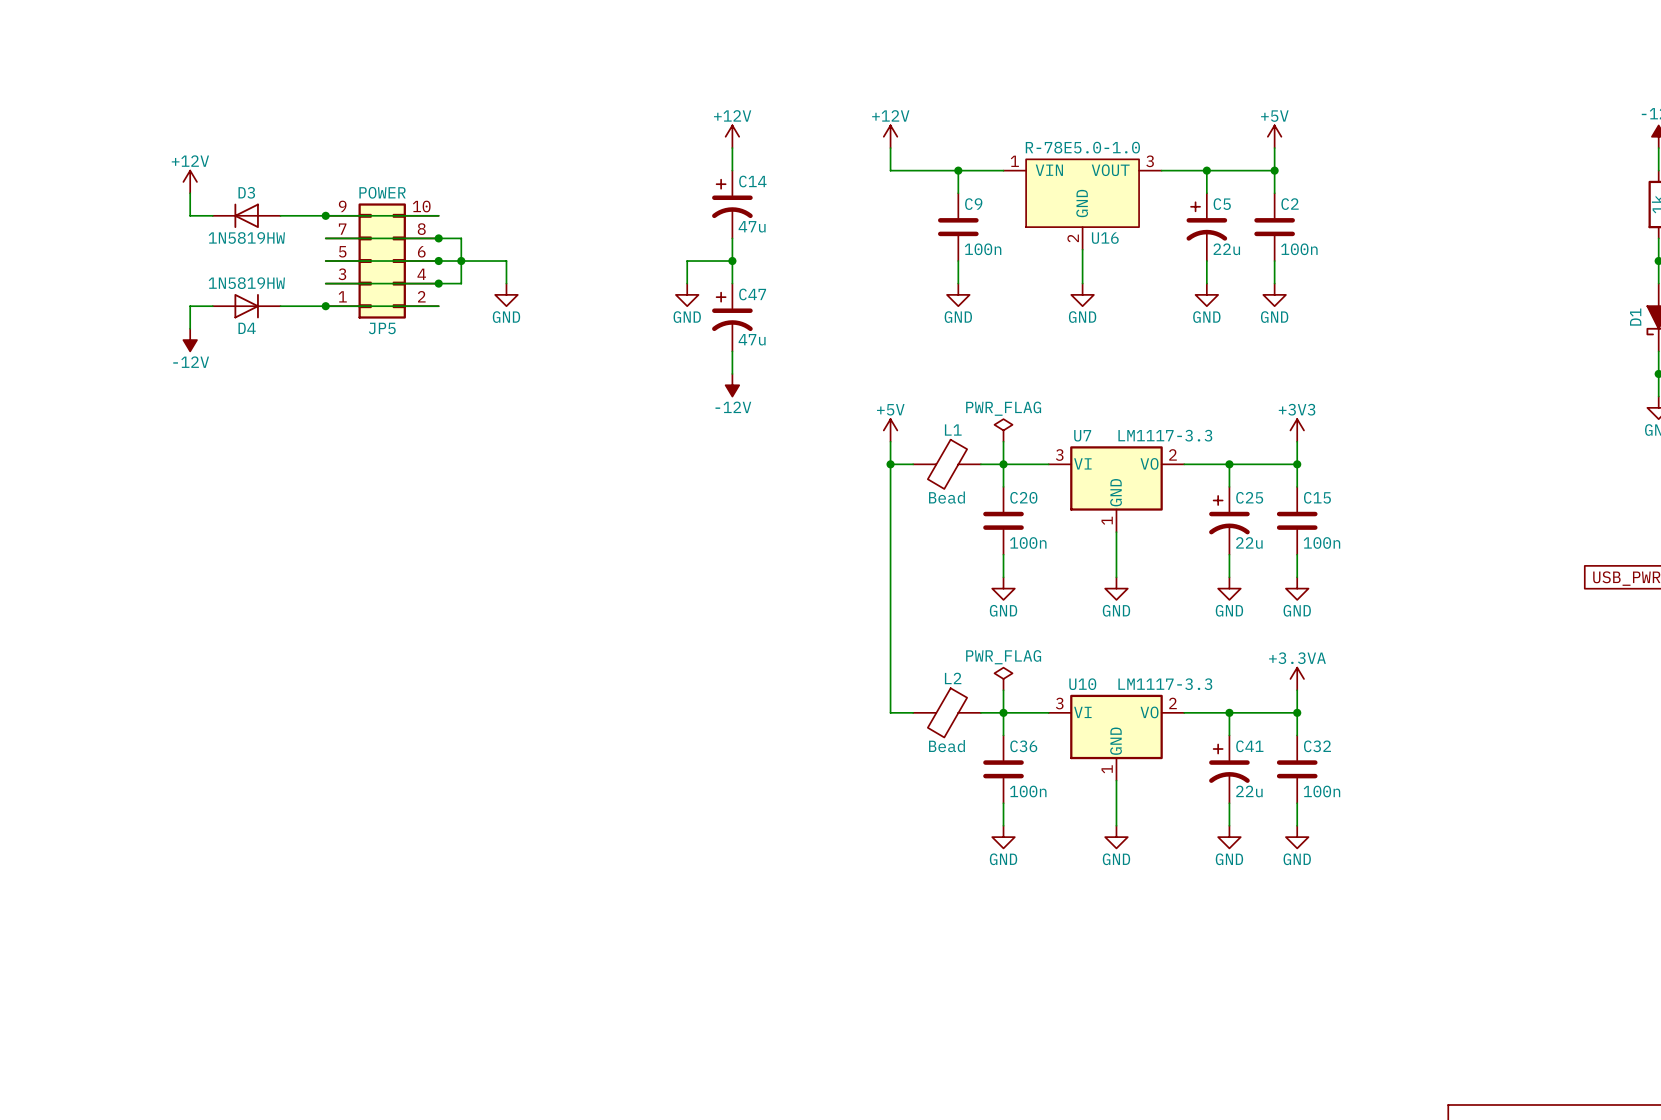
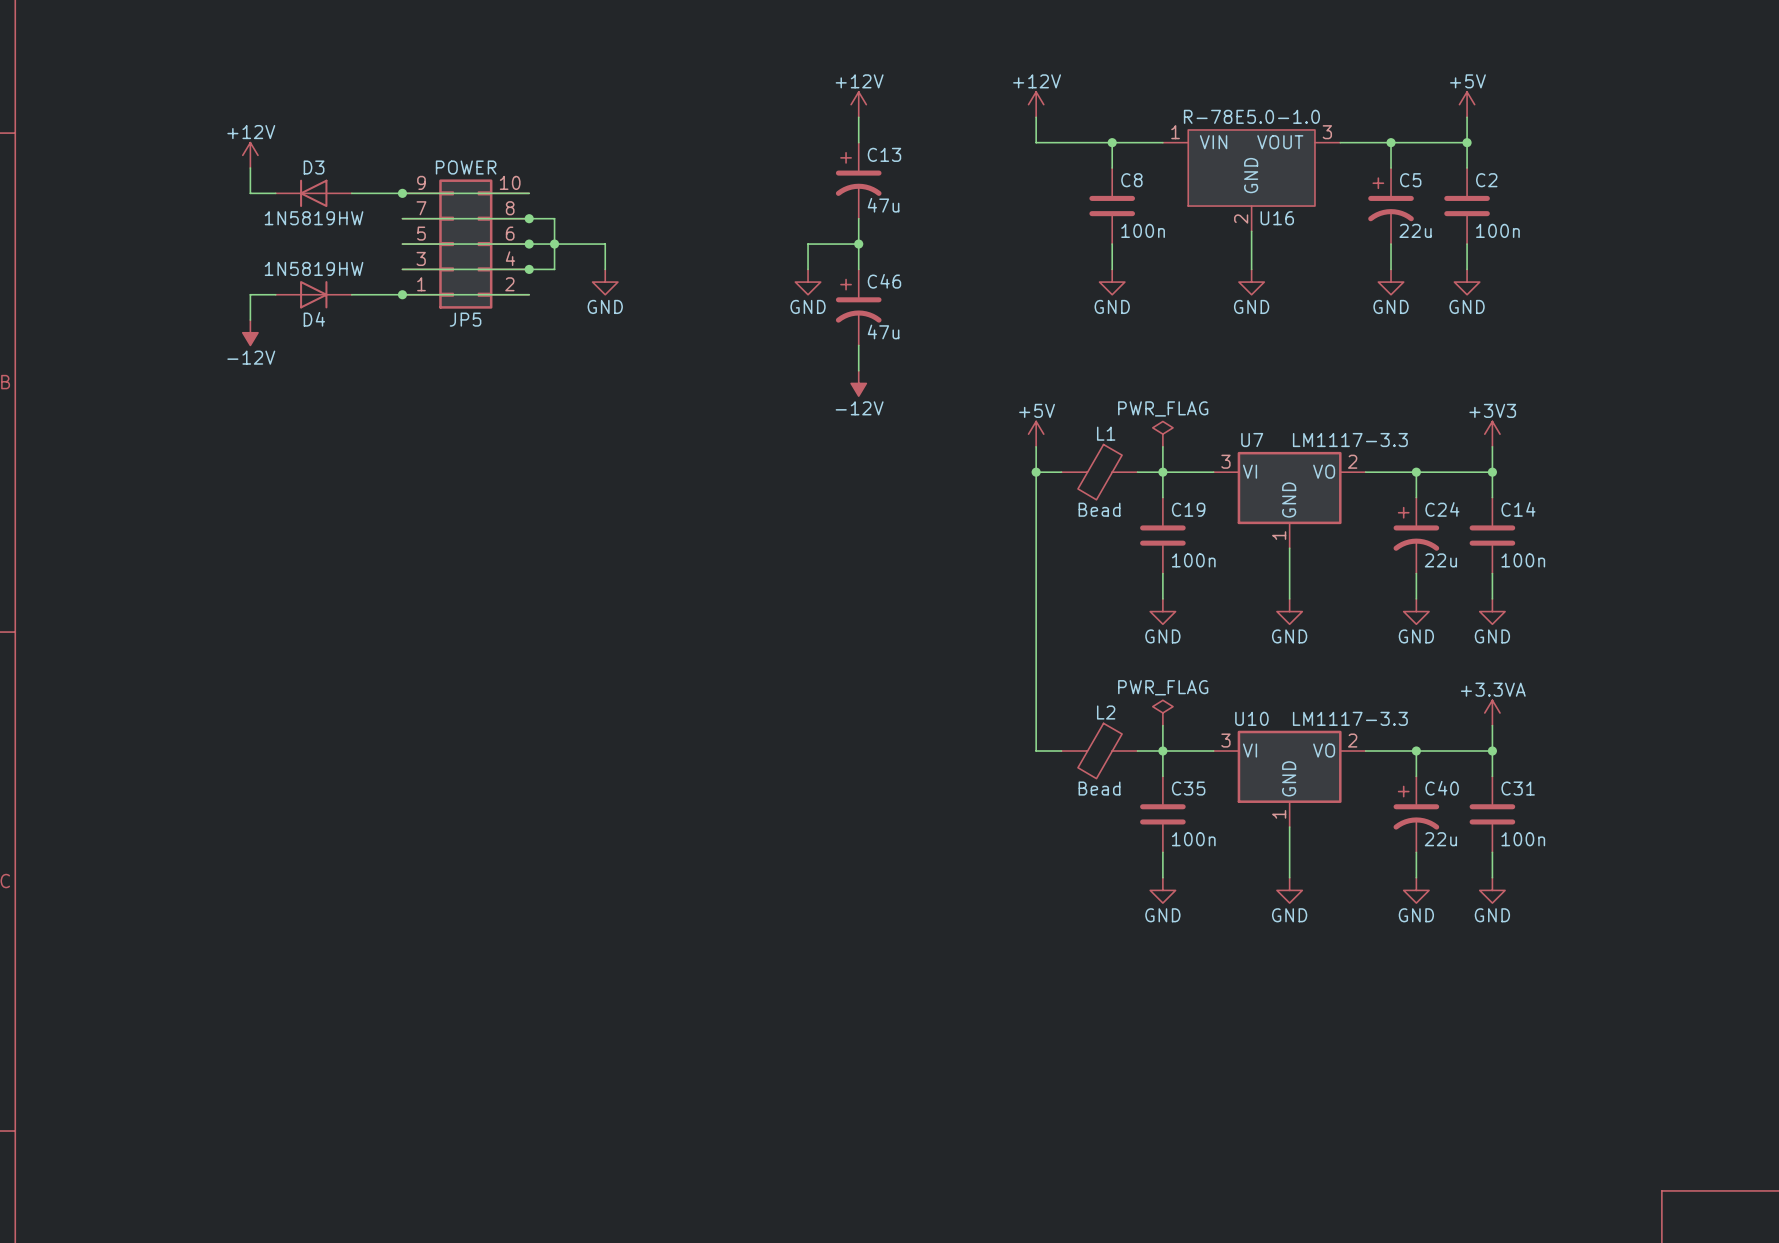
C14 name: C14 (752, 181) -> C13 (884, 154)
C9 name: C9 (973, 204) -> C8 (1131, 180)
C47 name: C47 (752, 294) -> C46 (884, 281)
C20 name: C20 (1023, 497) -> C19 (1188, 509)
C25 name: C25 (1249, 497) -> C24 (1442, 509)
C15 name: C15 (1317, 497) -> C14 (1518, 509)
C36 name: C36 (1023, 746) -> C35 (1188, 788)
C41 name: C41 (1249, 746) -> C40 (1442, 788)
C32 name: C32 (1317, 746) -> C31 (1518, 788)

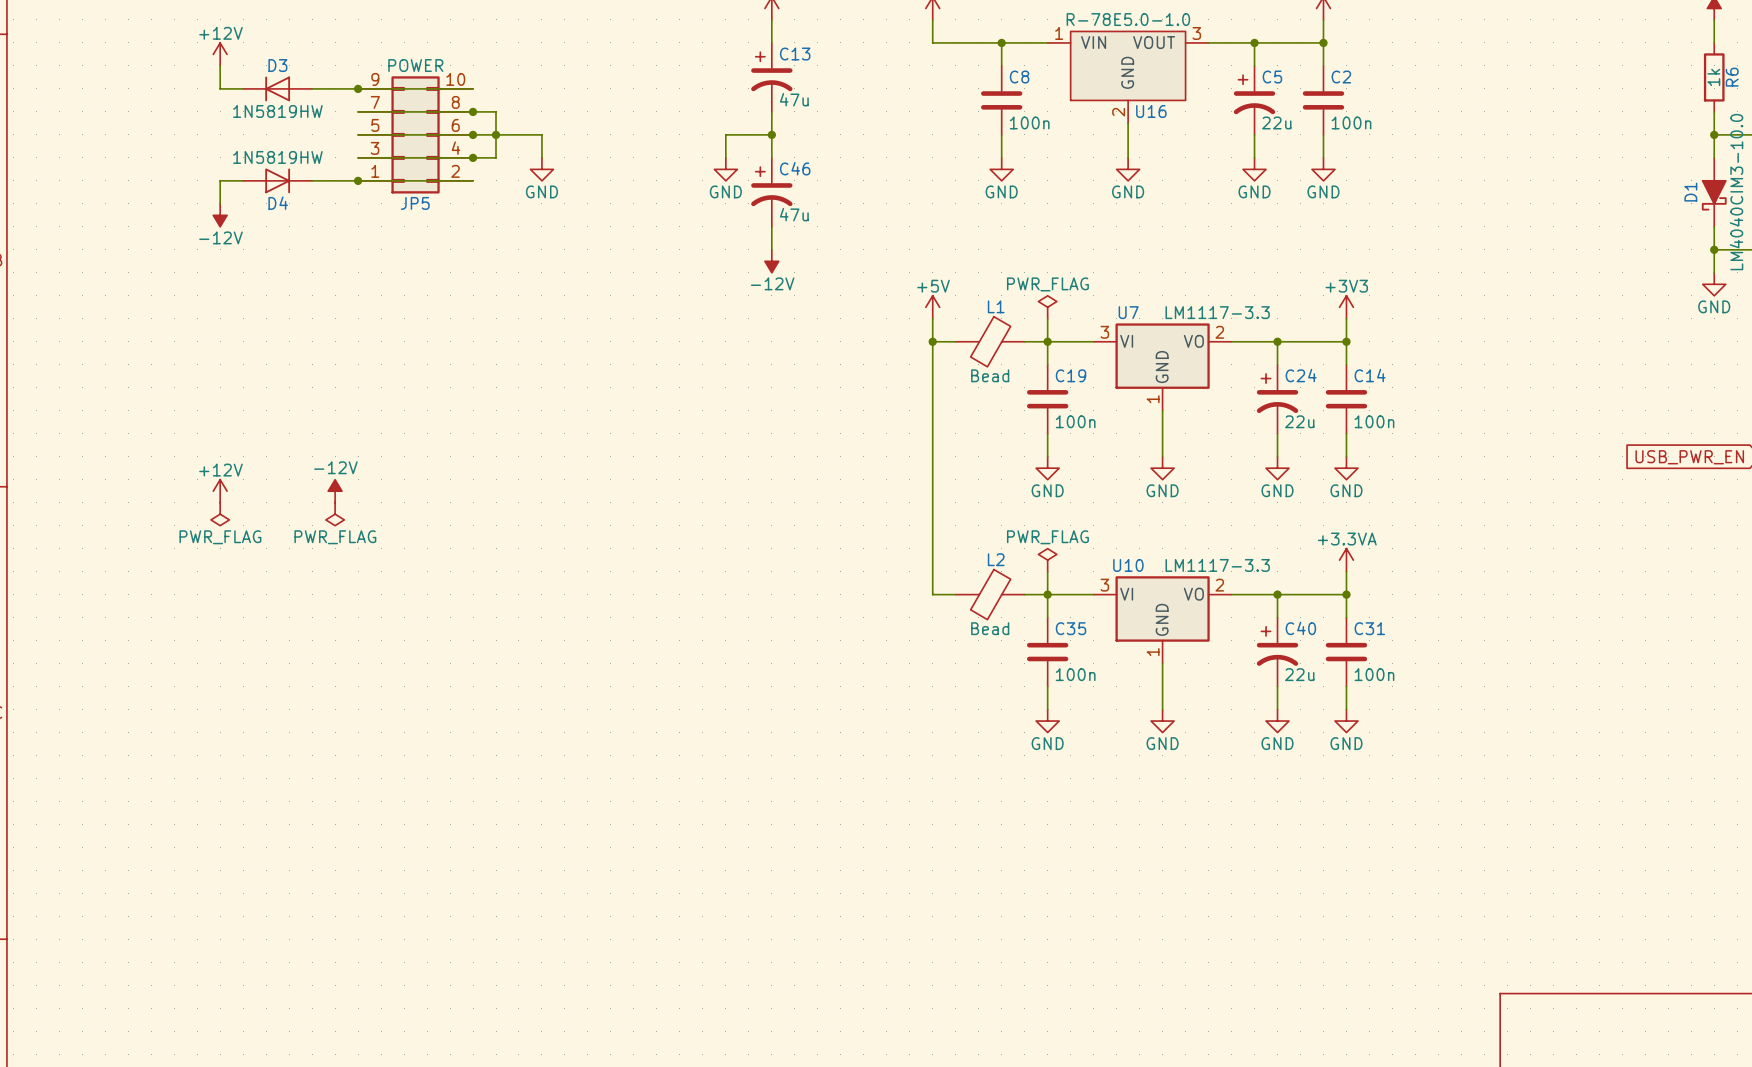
power symbol: none -> +12V (220, 491)
power symbol: none -> -12V (335, 491)
power symbol: none -> PWR_FLAG (220, 514)
power symbol: none -> PWR_FLAG (335, 514)

